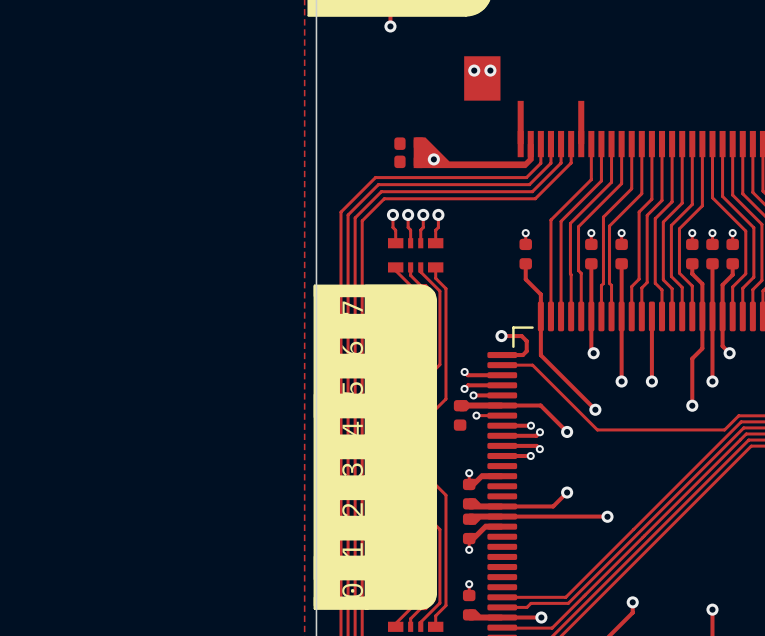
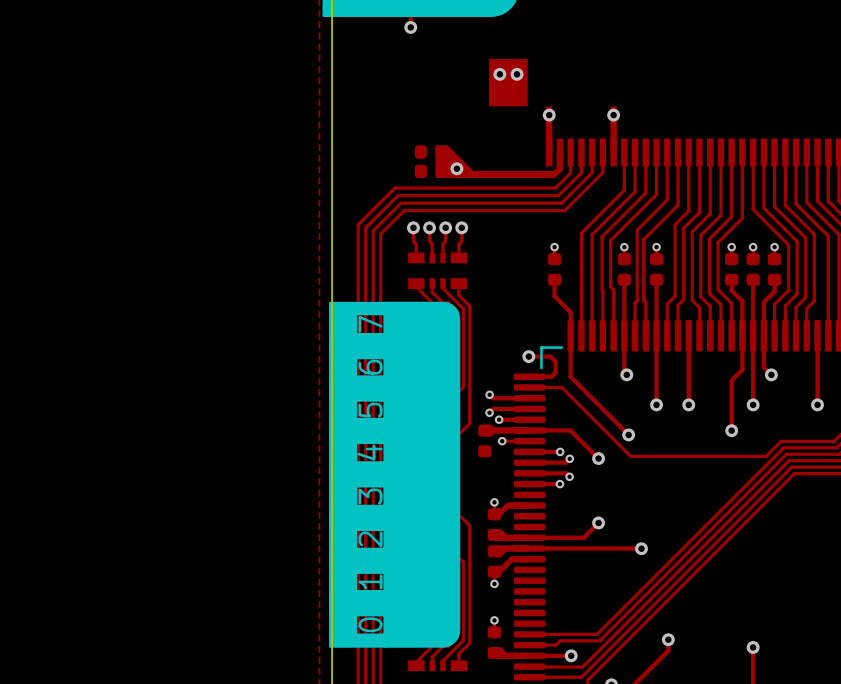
via: none -> (549, 115)
via: none -> (613, 115)

